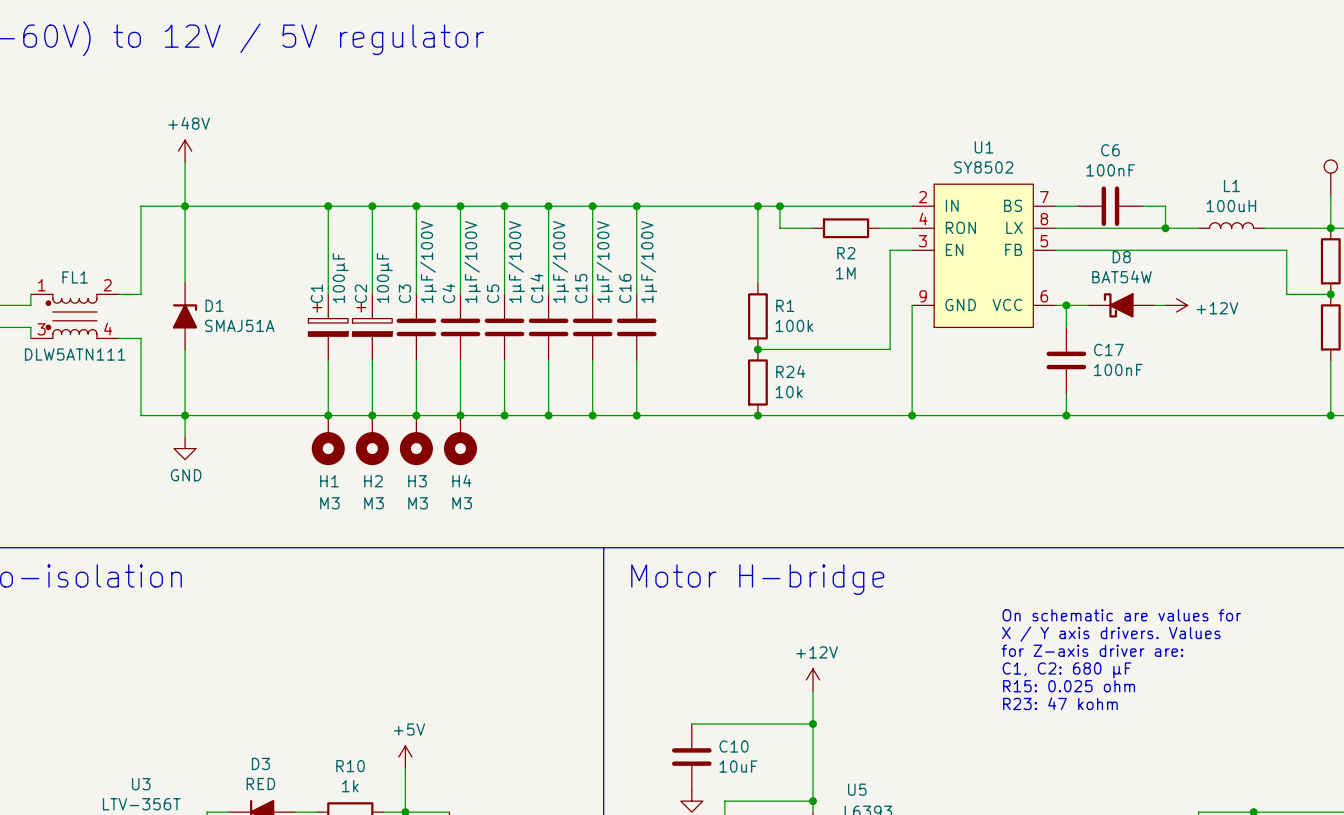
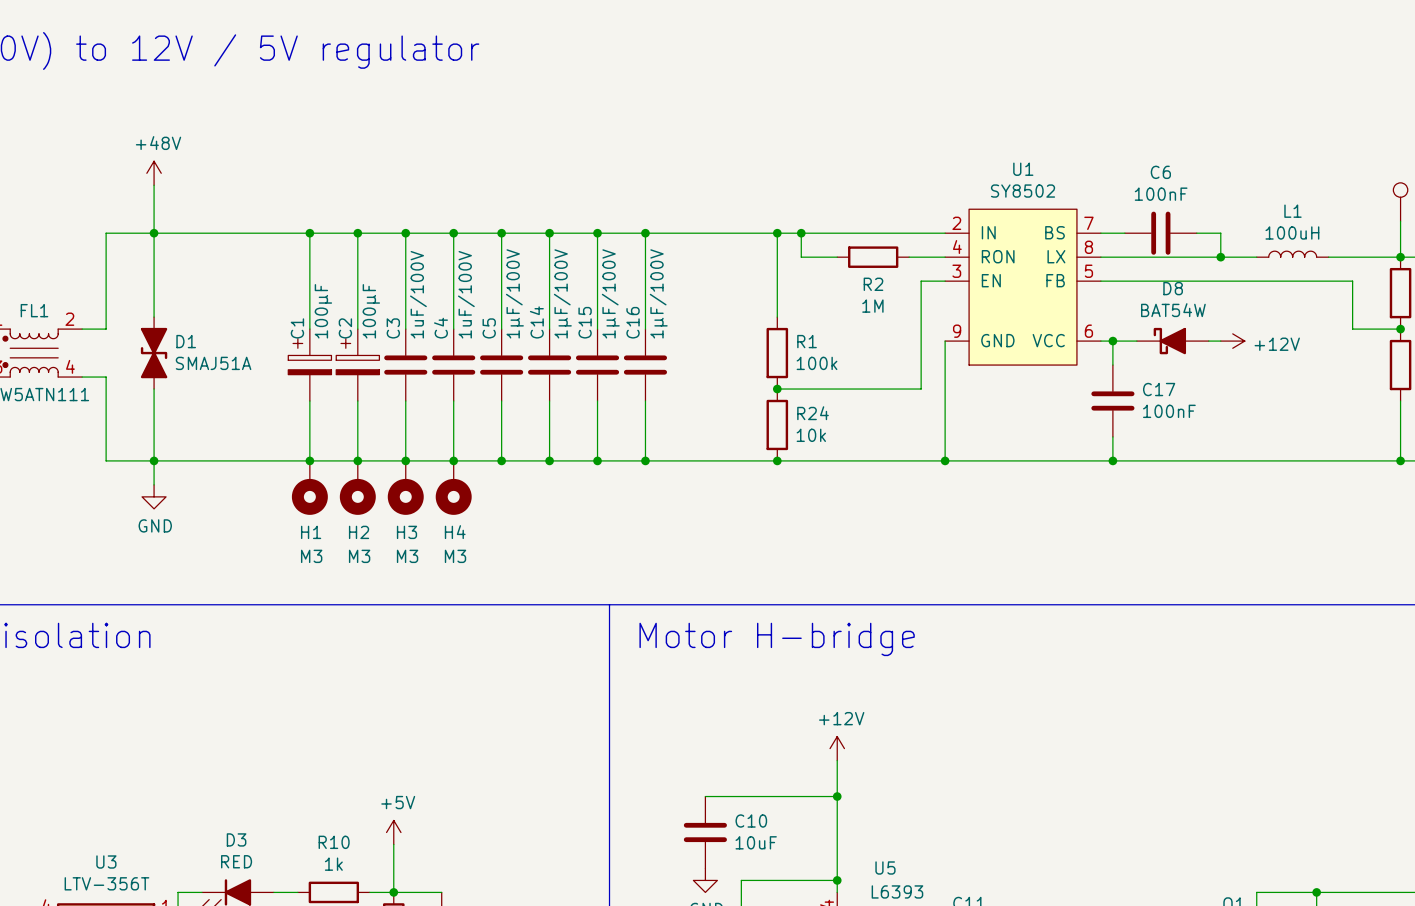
C3 value: 1µF/100V (428, 262) -> 1uF/100V (418, 294)
C4 value: 1µF/100V (472, 262) -> 1uF/100V (466, 294)
D1 symbol: [172, 283, 198, 350] -> [140, 317, 168, 390]
text: On schematic are values for (1121, 615) -> none
text: X / Y axis drivers. Values (1111, 634) -> none
text: for Z-axis driver are: (1092, 650) -> none
text: C1, C2: 680 µF (1066, 670) -> none
text: R15: 0.025 ohm (1069, 686) -> none
text: R23: 47 kohm (1060, 703) -> none

